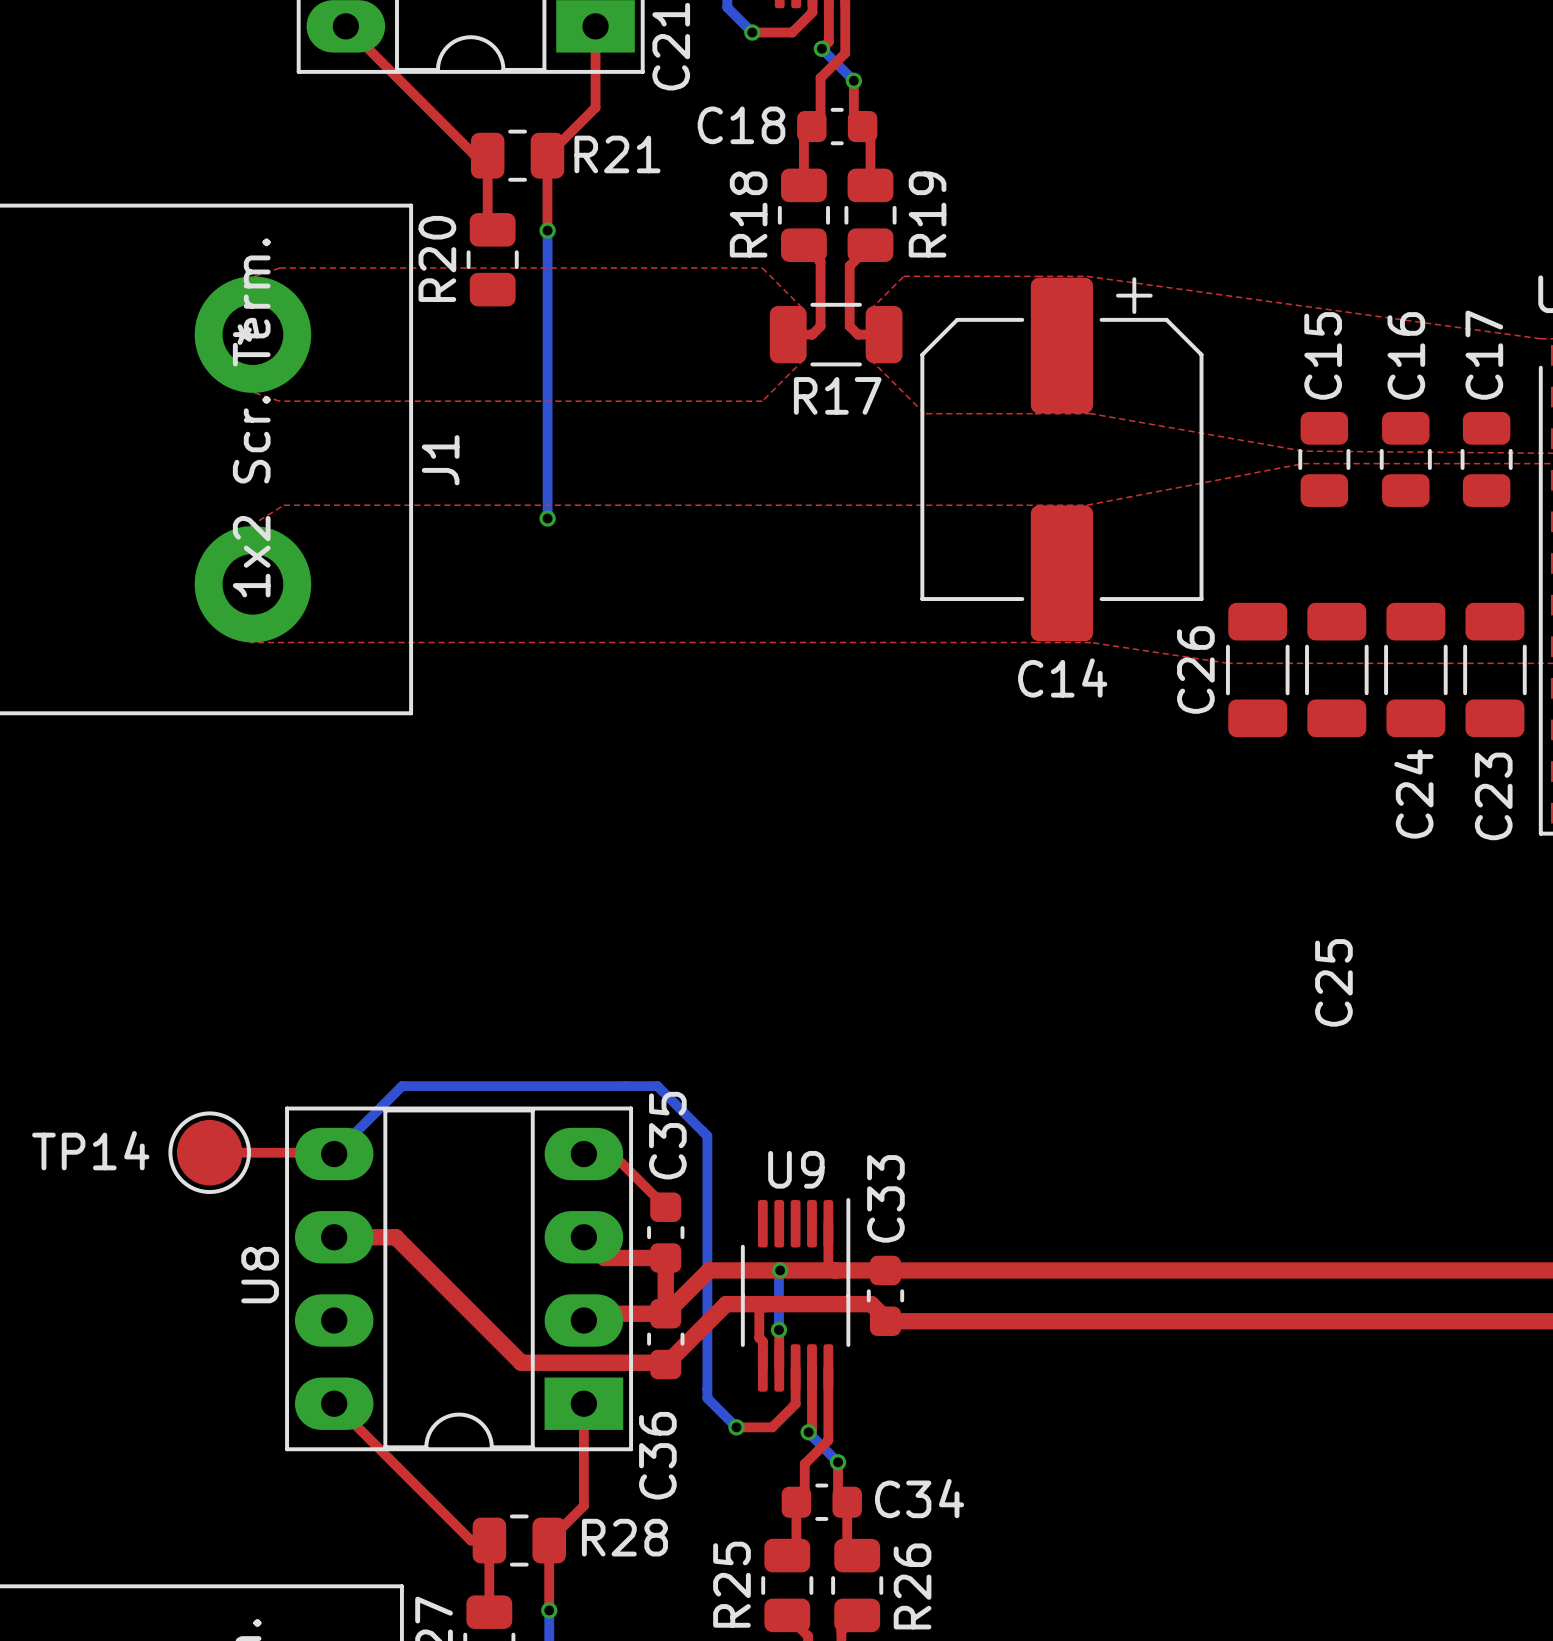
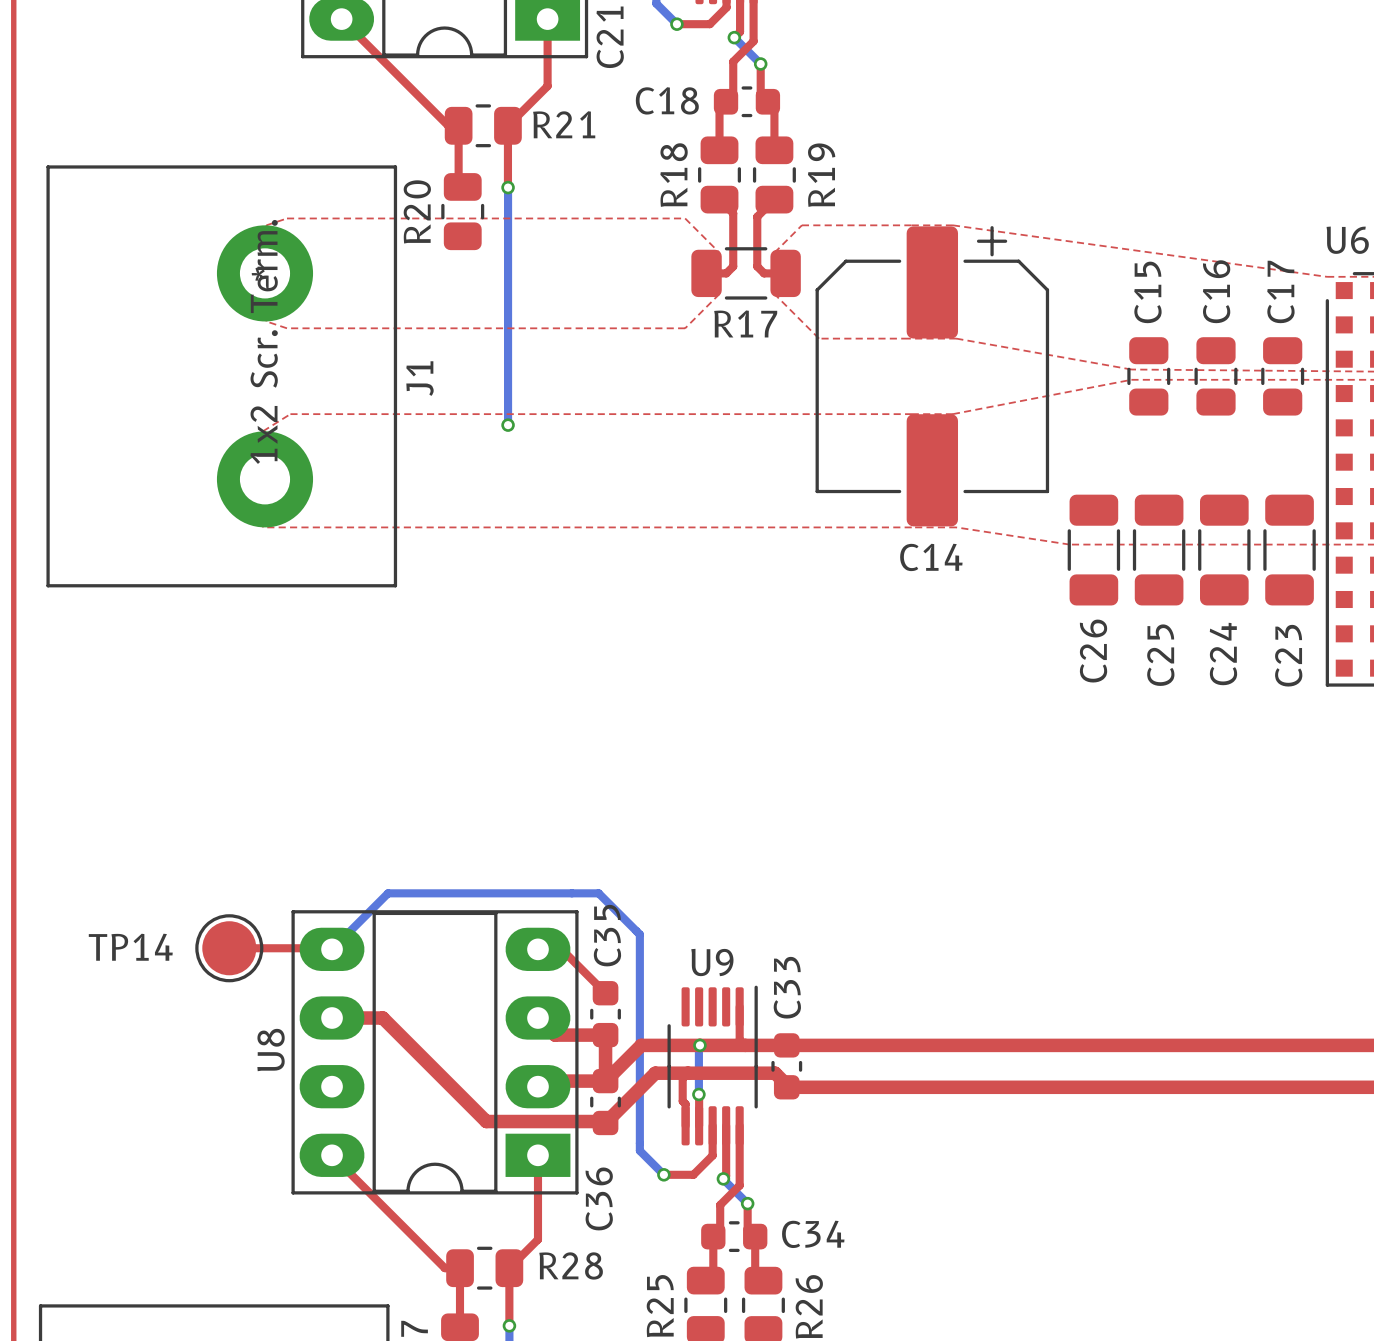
C26 name position: C26 (1195, 670) -> C26 (1093, 651)
C25 name position: C25 (1333, 982) -> C25 (1160, 655)

